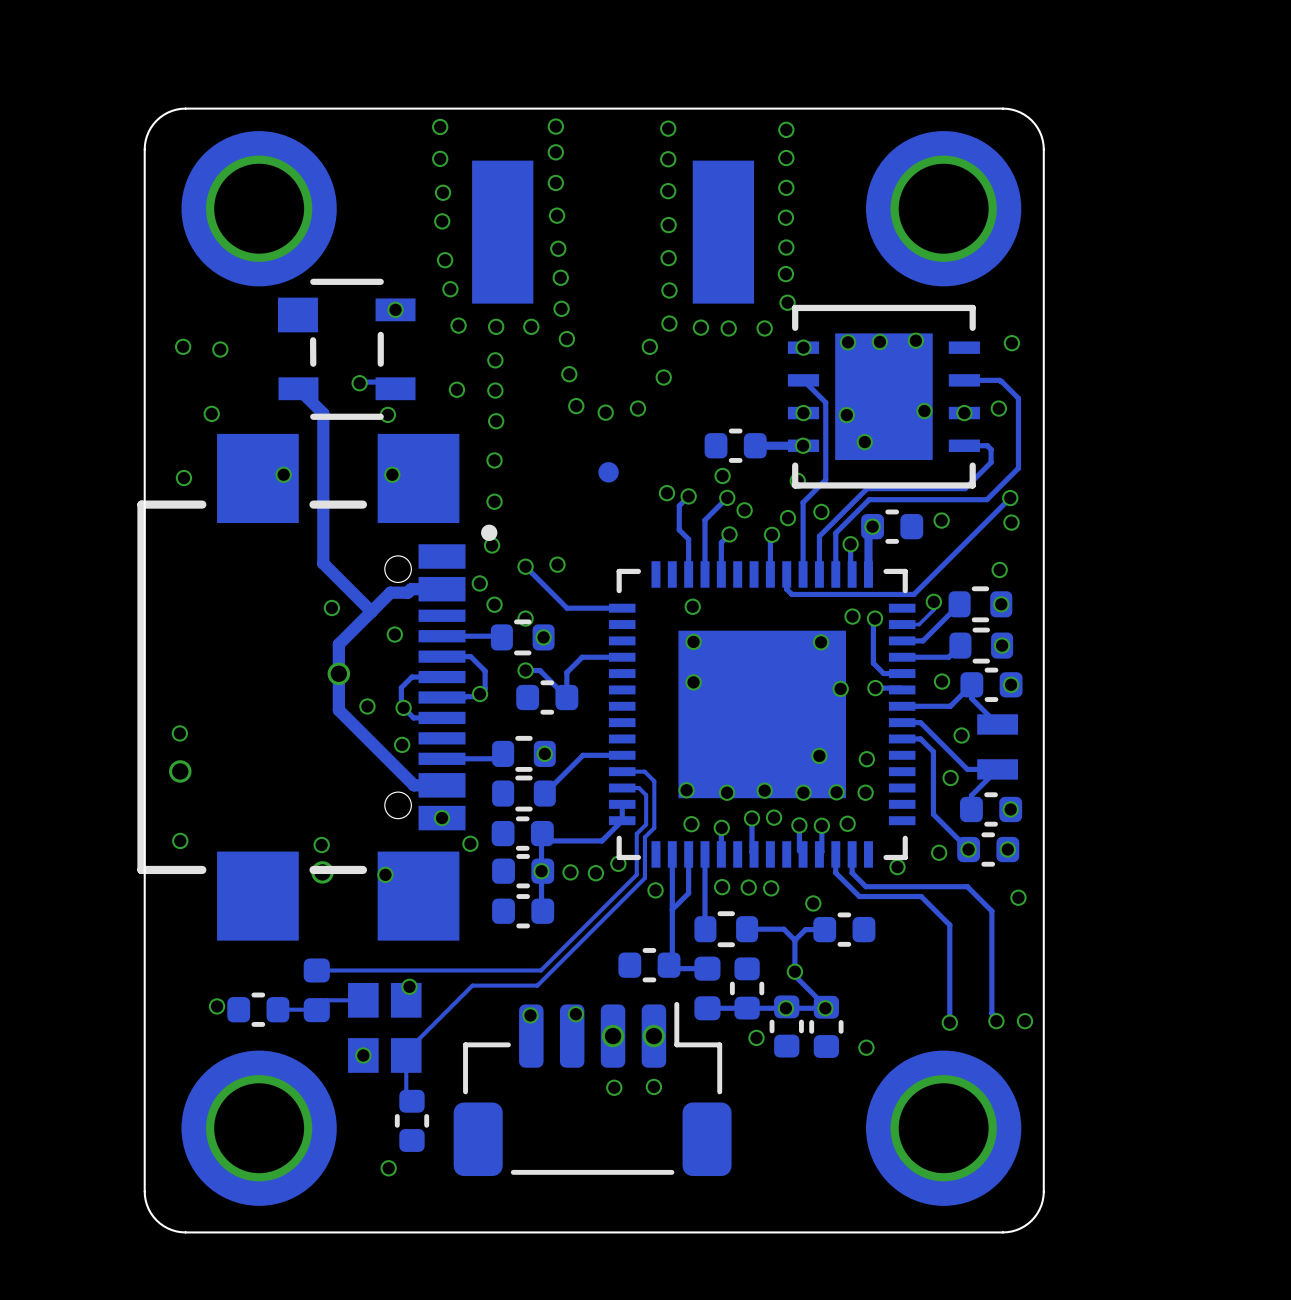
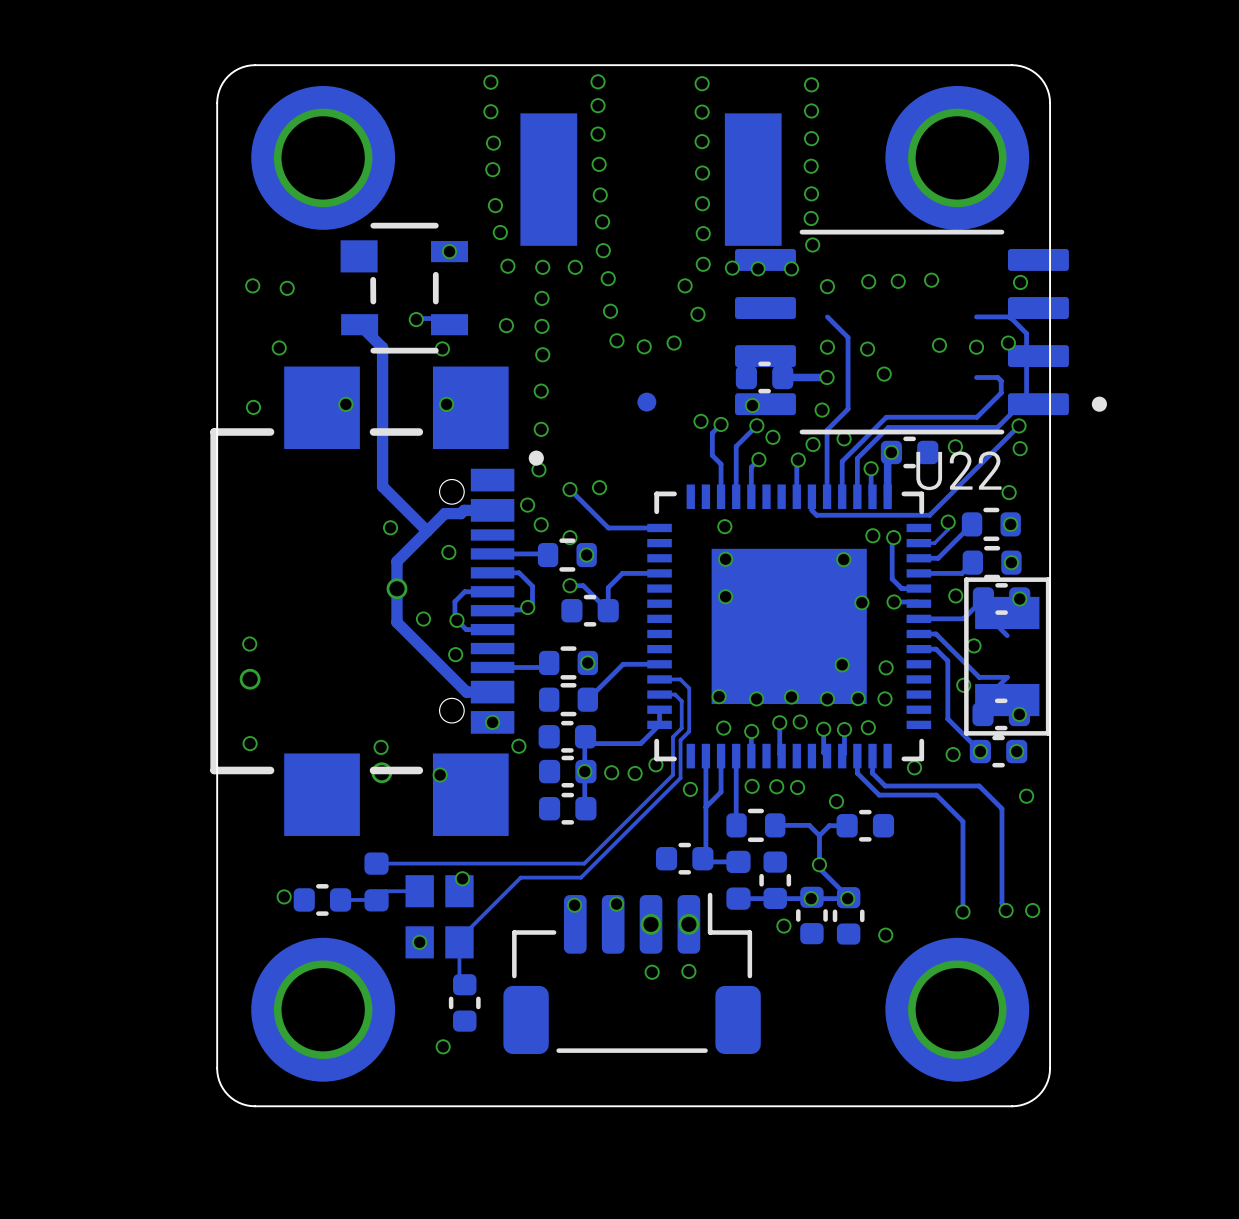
part: (883, 396) -> none
U22: none -> (920, 332)
part footprint: [977, 714, 1019, 780] -> [964, 577, 1051, 736]

